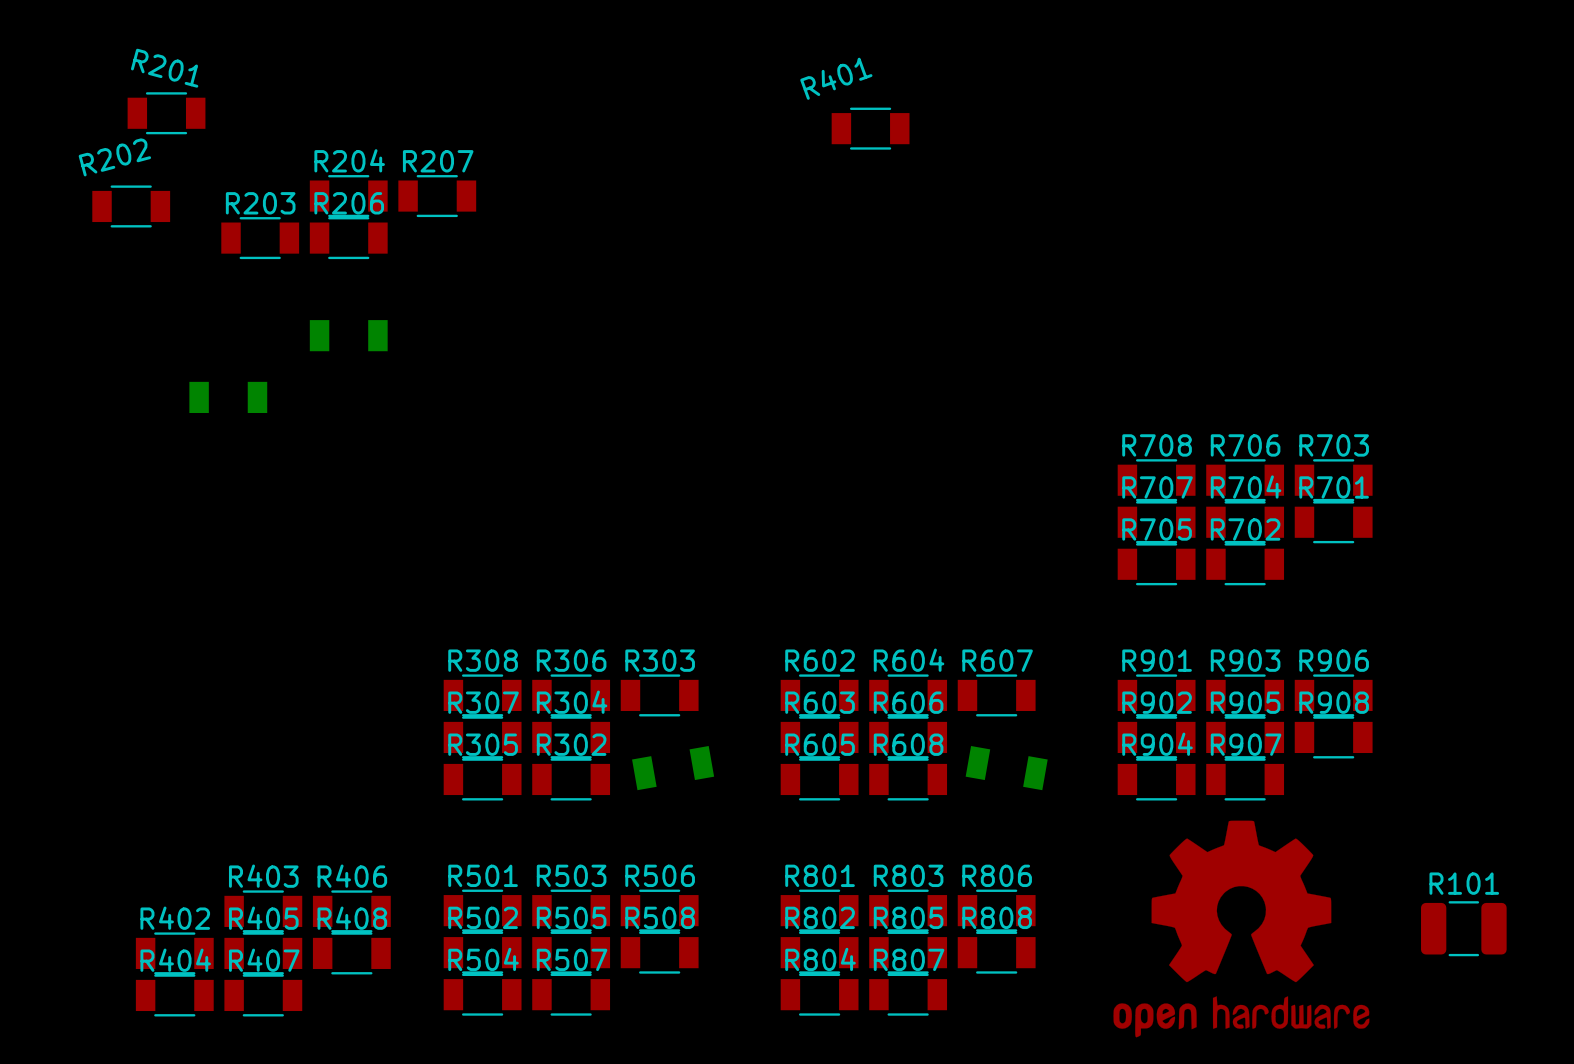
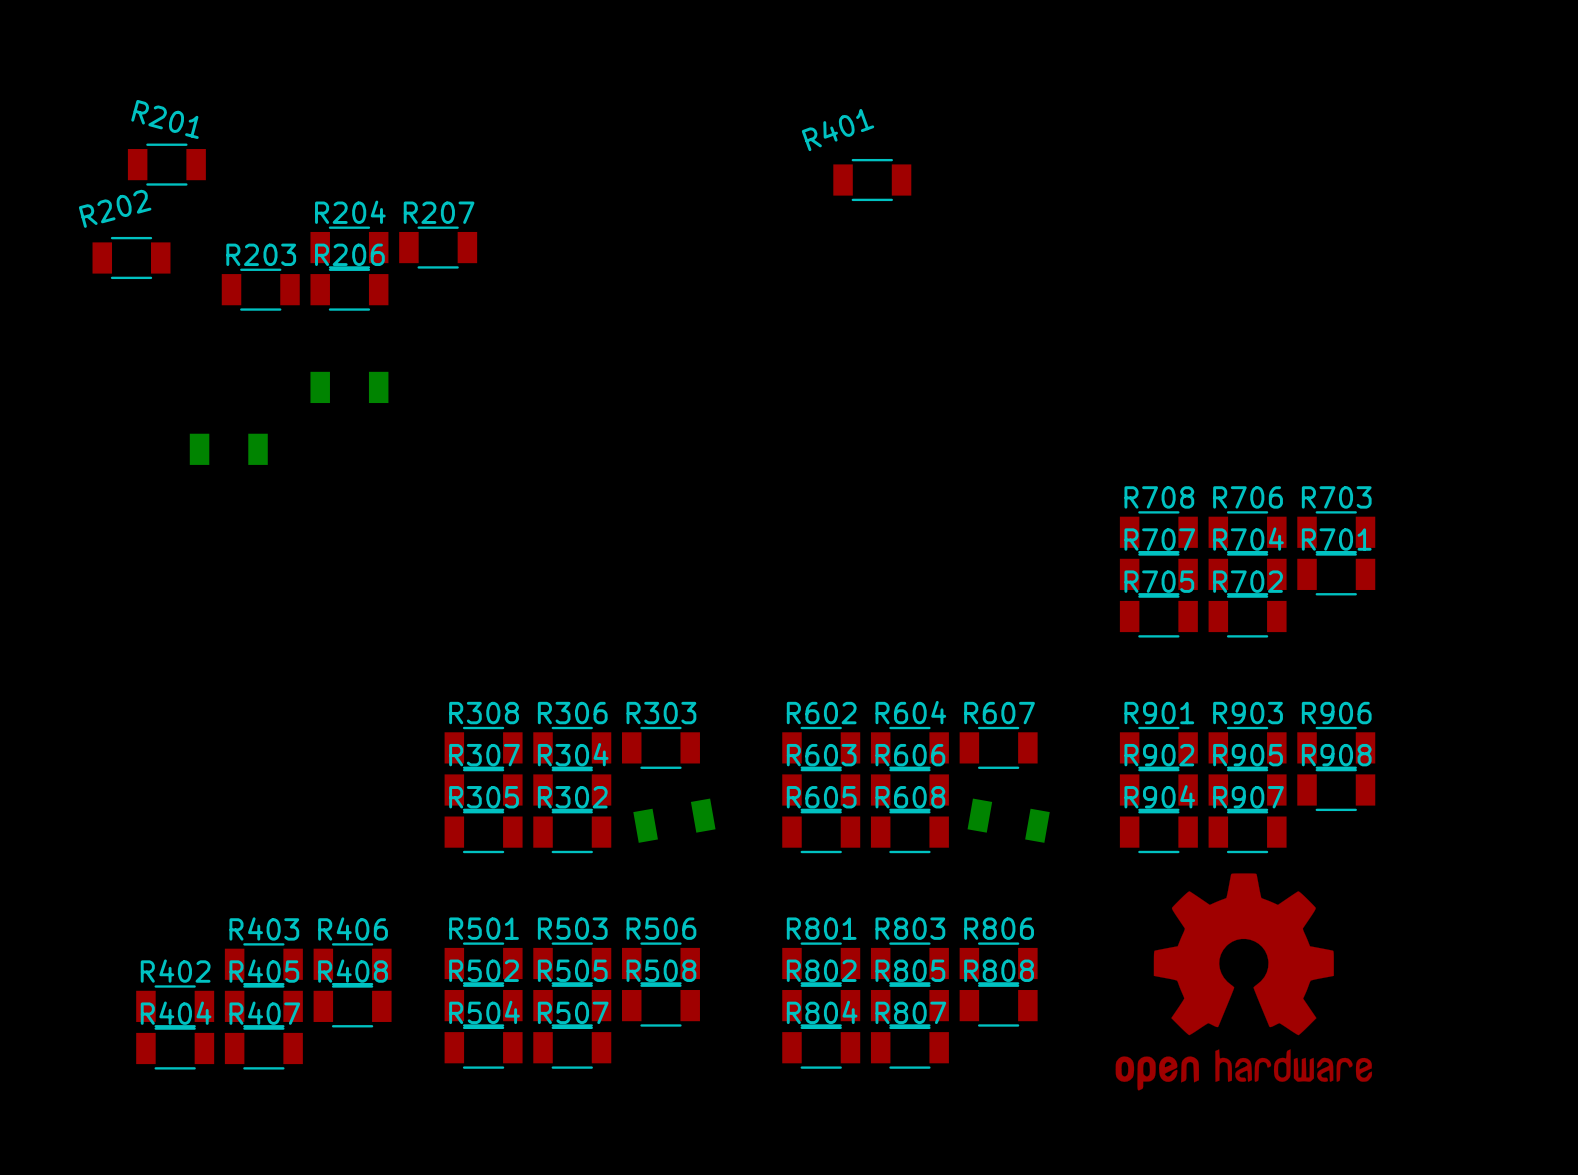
R101: (1463, 928) -> none

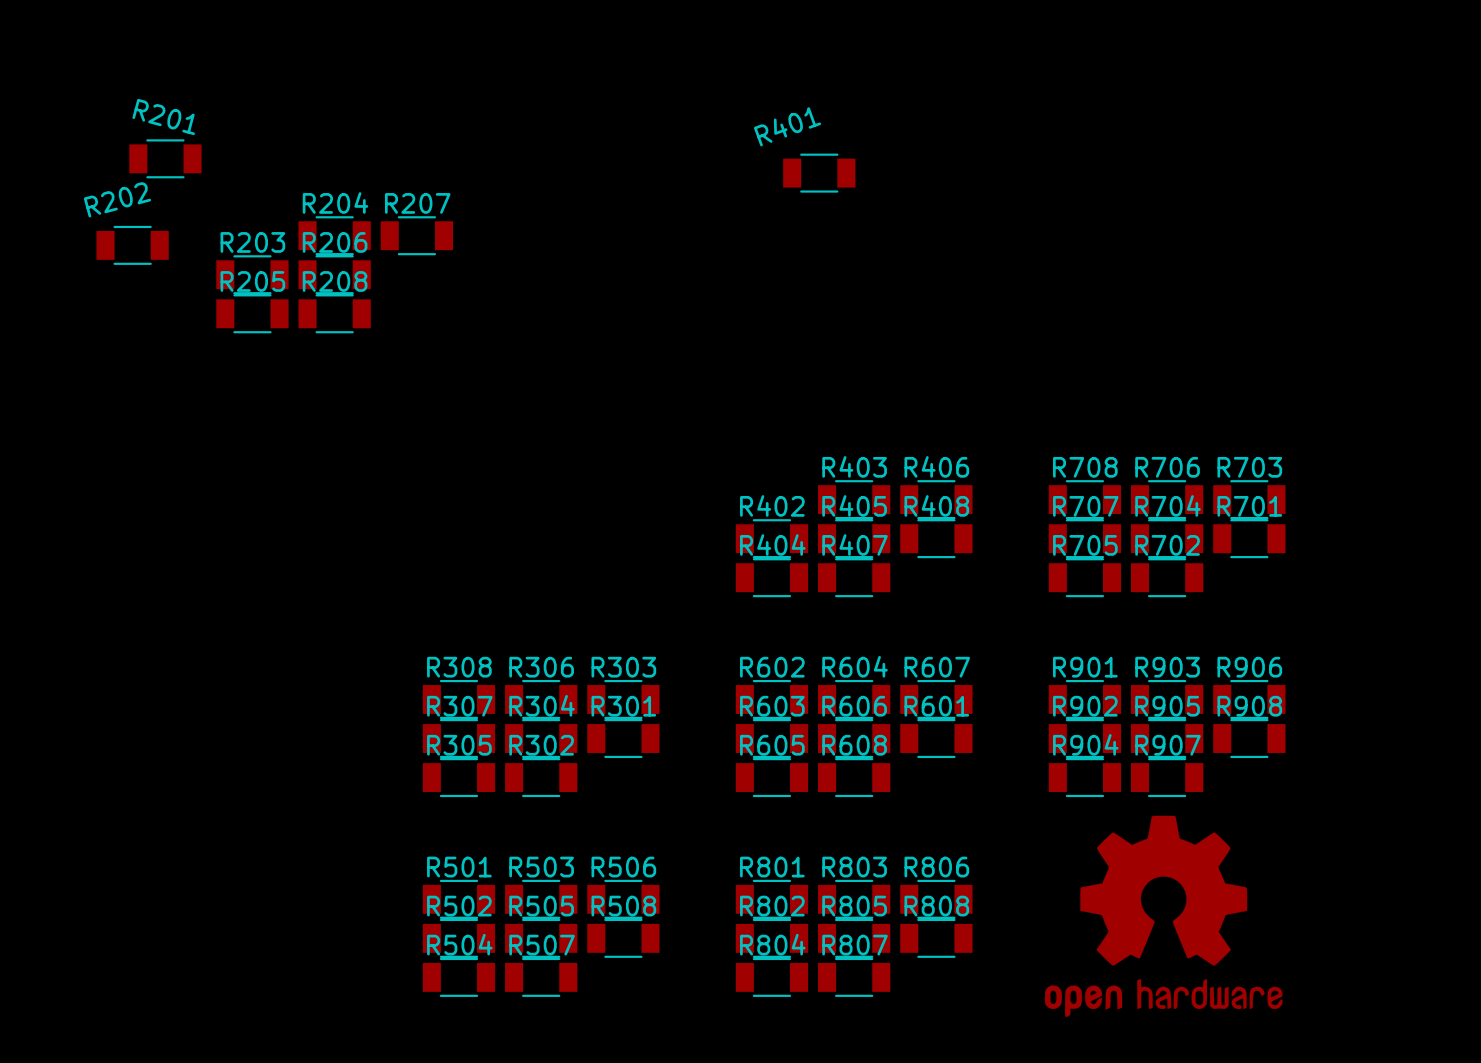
R208 side: bottom (349, 387) -> top (334, 313)
R205 side: bottom (228, 449) -> top (252, 313)
R301 side: bottom (674, 820) -> top (623, 738)
R601 side: bottom (1008, 820) -> top (936, 738)
R403 position: (263, 964) -> (854, 499)
R406 position: (352, 964) -> (936, 499)
R402 position: (175, 1006) -> (771, 538)
R405 position: (263, 1006) -> (854, 538)
R408 position: (352, 1006) -> (936, 538)
R404 position: (175, 1048) -> (771, 577)
R407 position: (263, 1048) -> (854, 577)

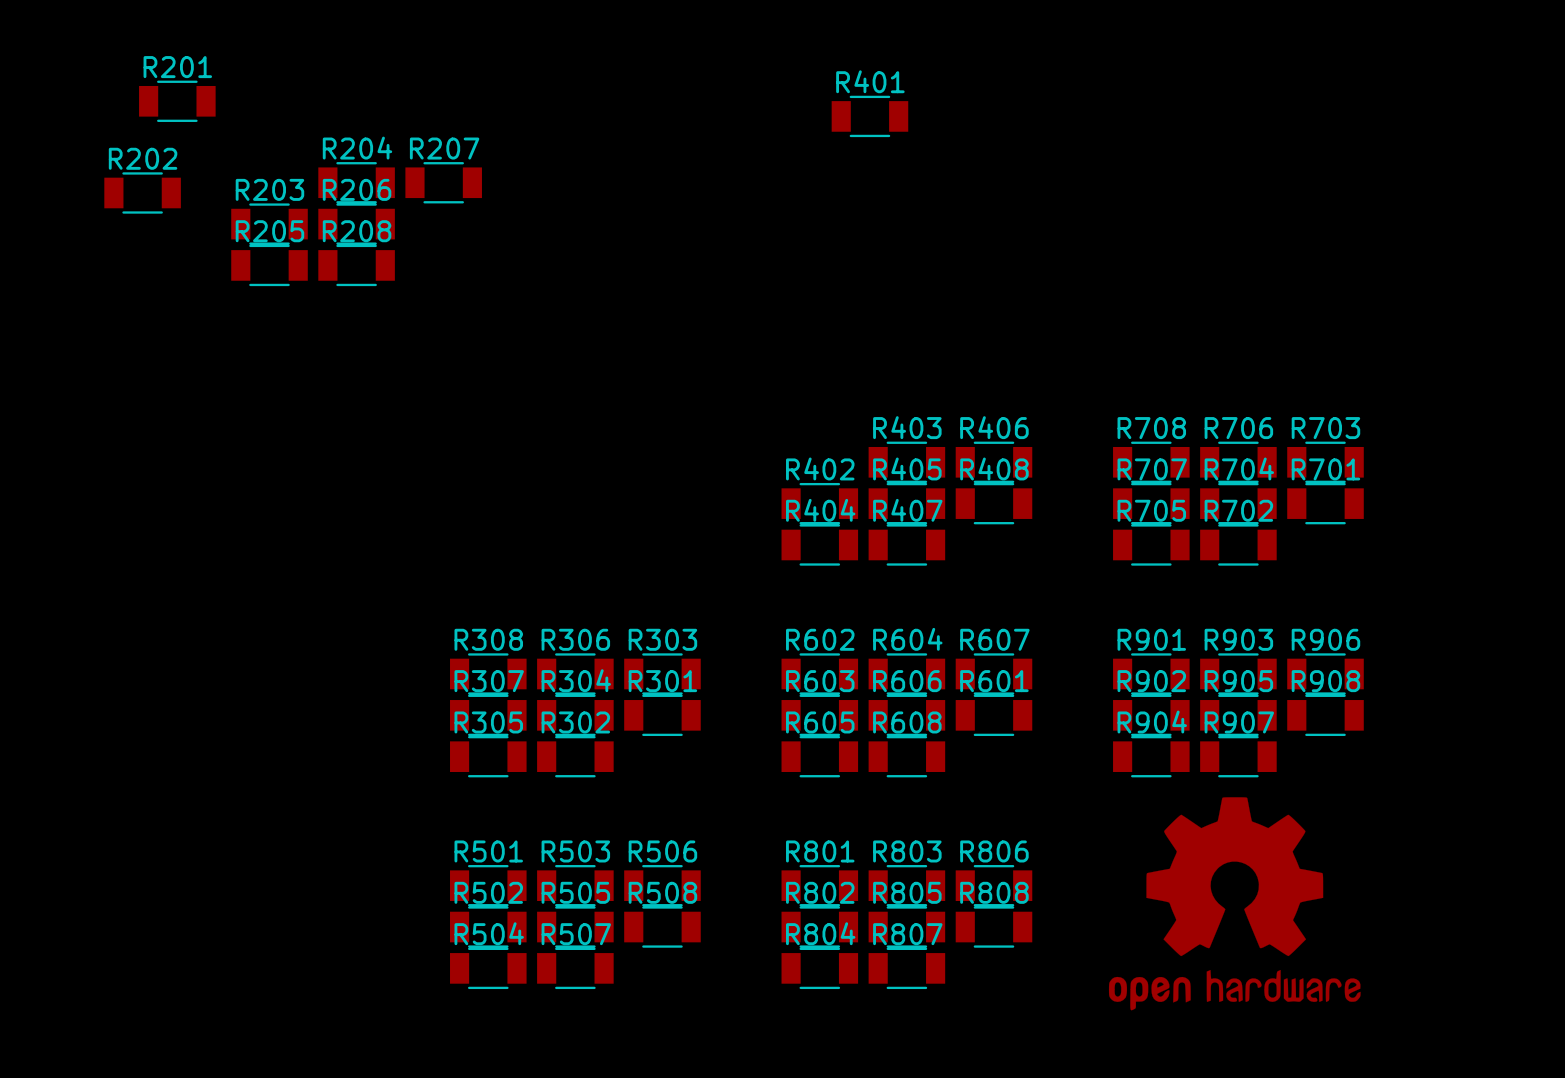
R201 name rotation: 0° (163, 116) -> 15° counterclockwise (177, 67)
R401 name rotation: 0° (787, 126) -> 20° clockwise (870, 81)
R202 name rotation: 0° (117, 199) -> 15° clockwise (143, 158)

